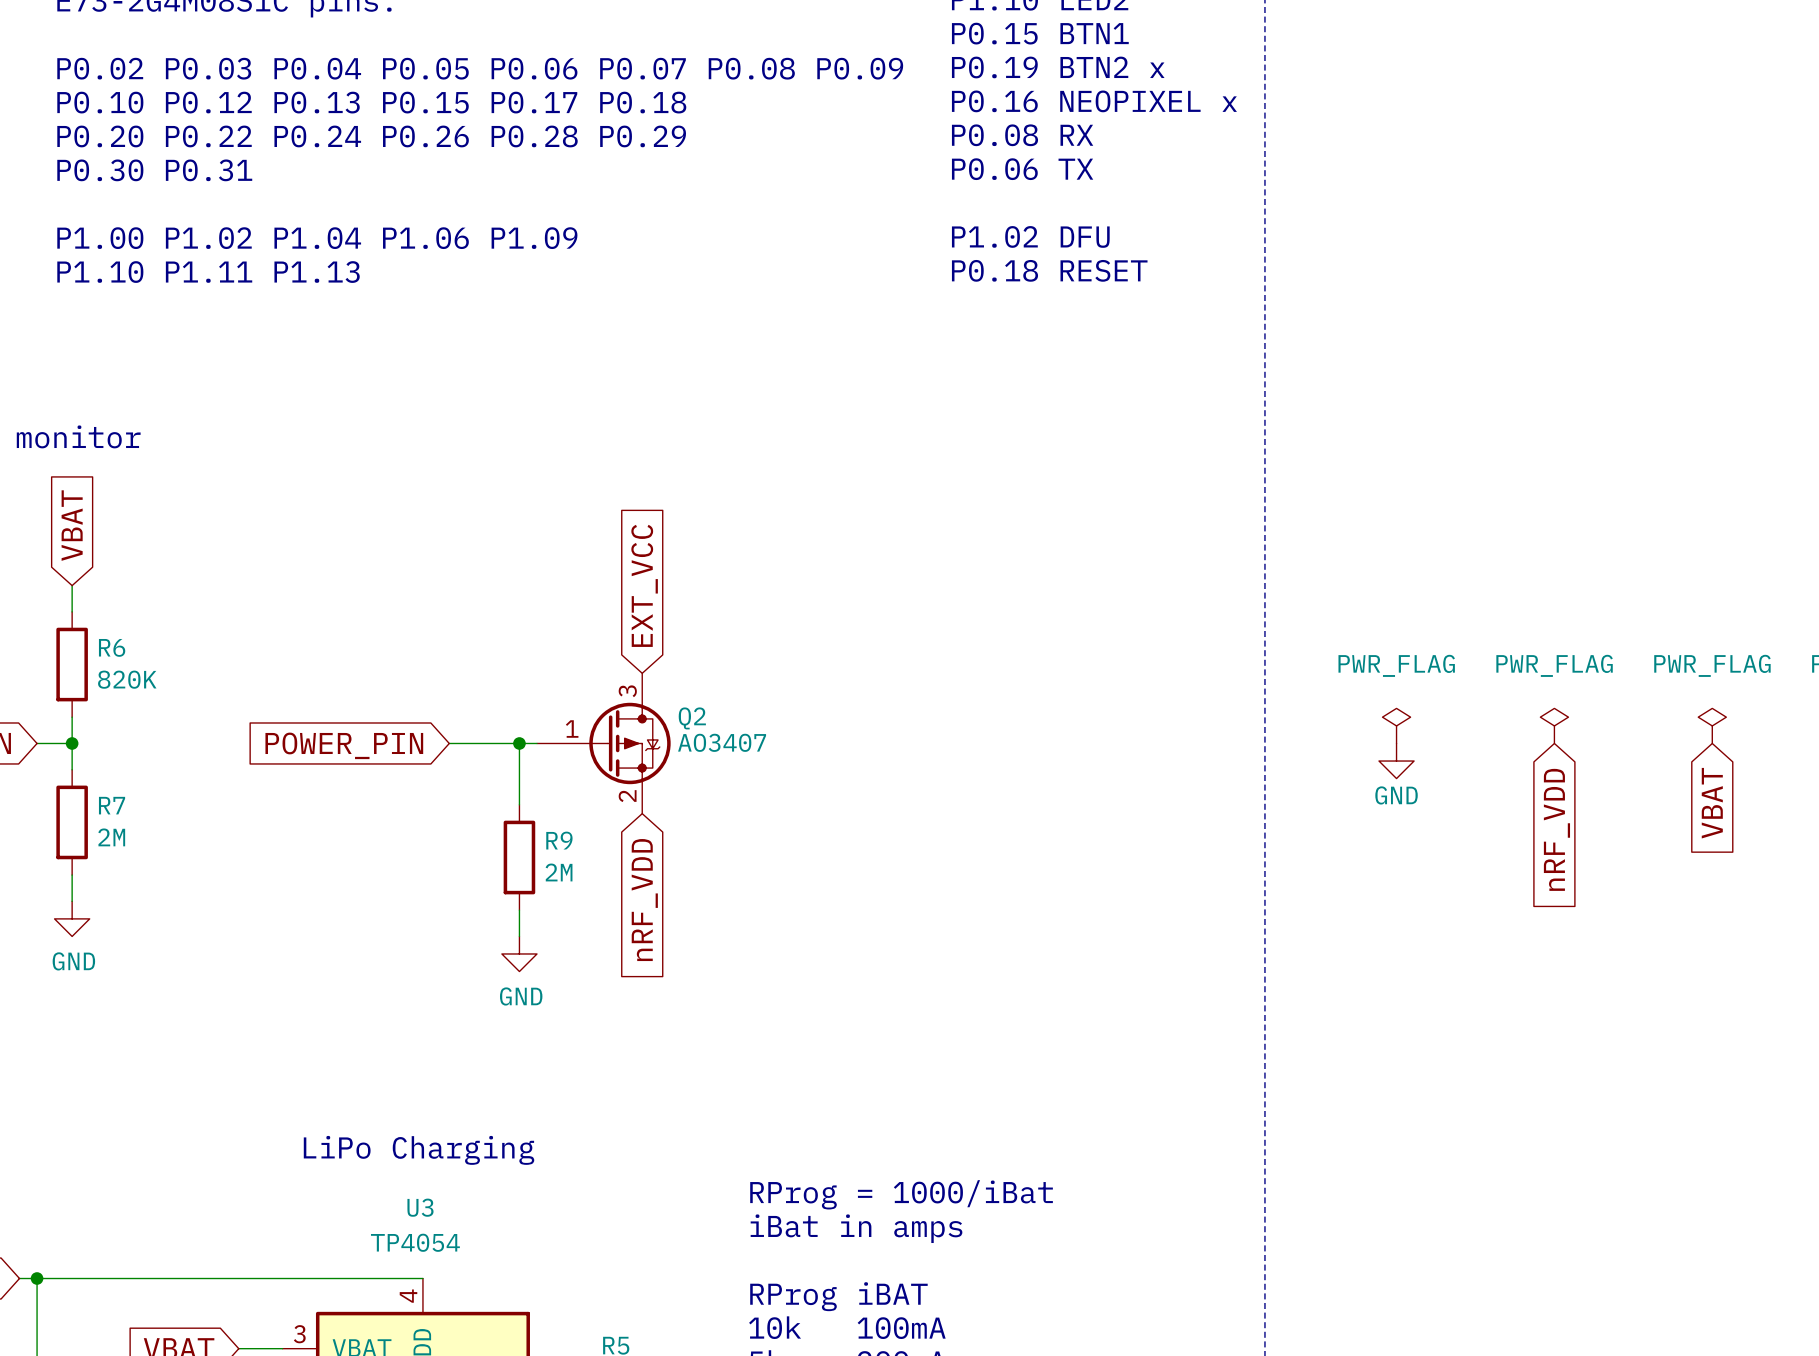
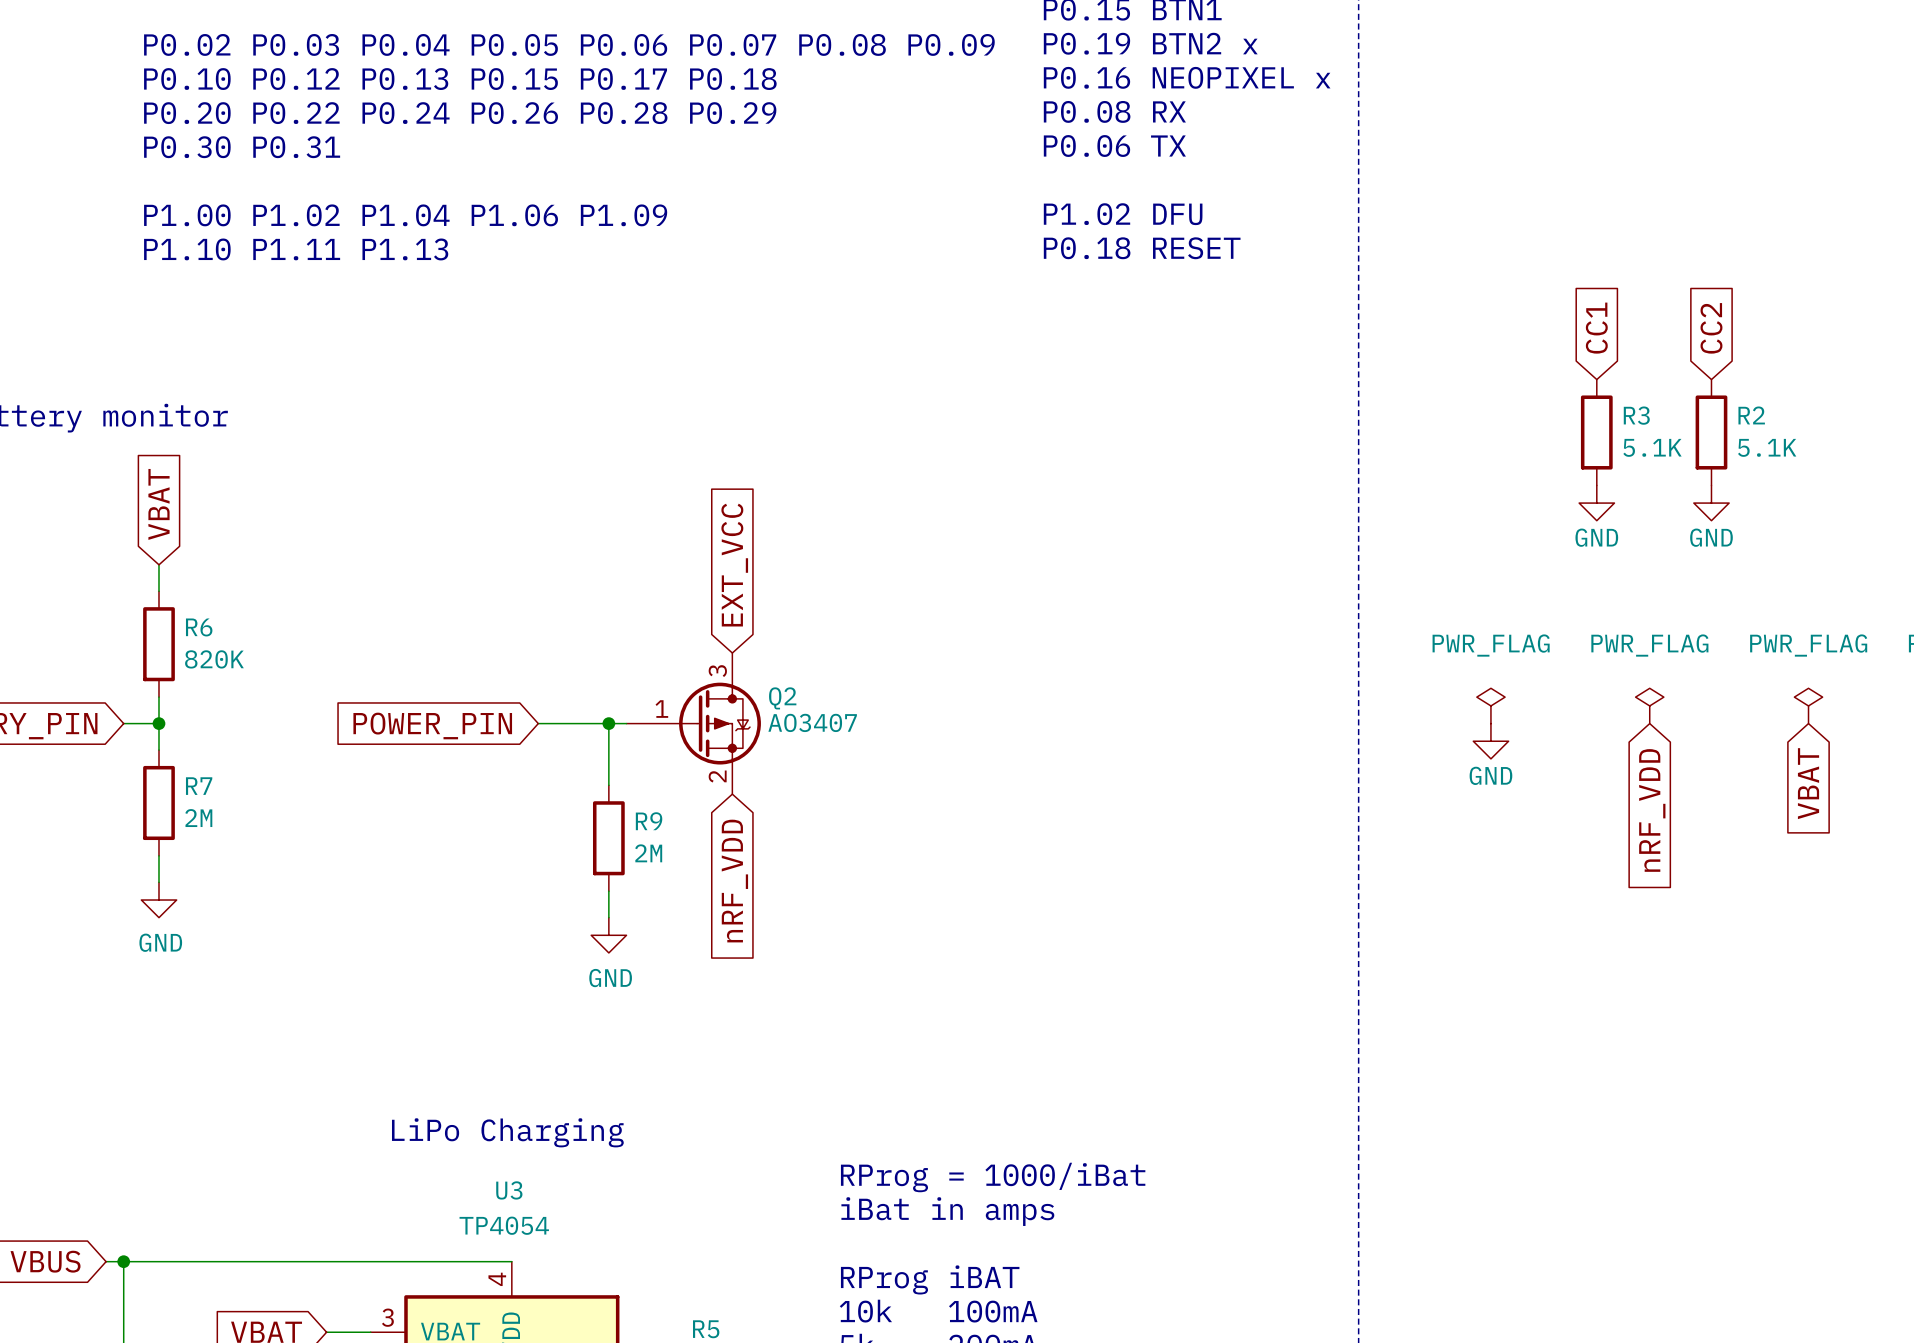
global label: none -> CC1 (1596, 328)
global label: none -> CC2 (1711, 328)
R3: none -> 5.1K (1596, 432)
R2: none -> 5.1K (1711, 432)
power symbol: none -> GND (1596, 503)
power symbol: none -> GND (1711, 503)

